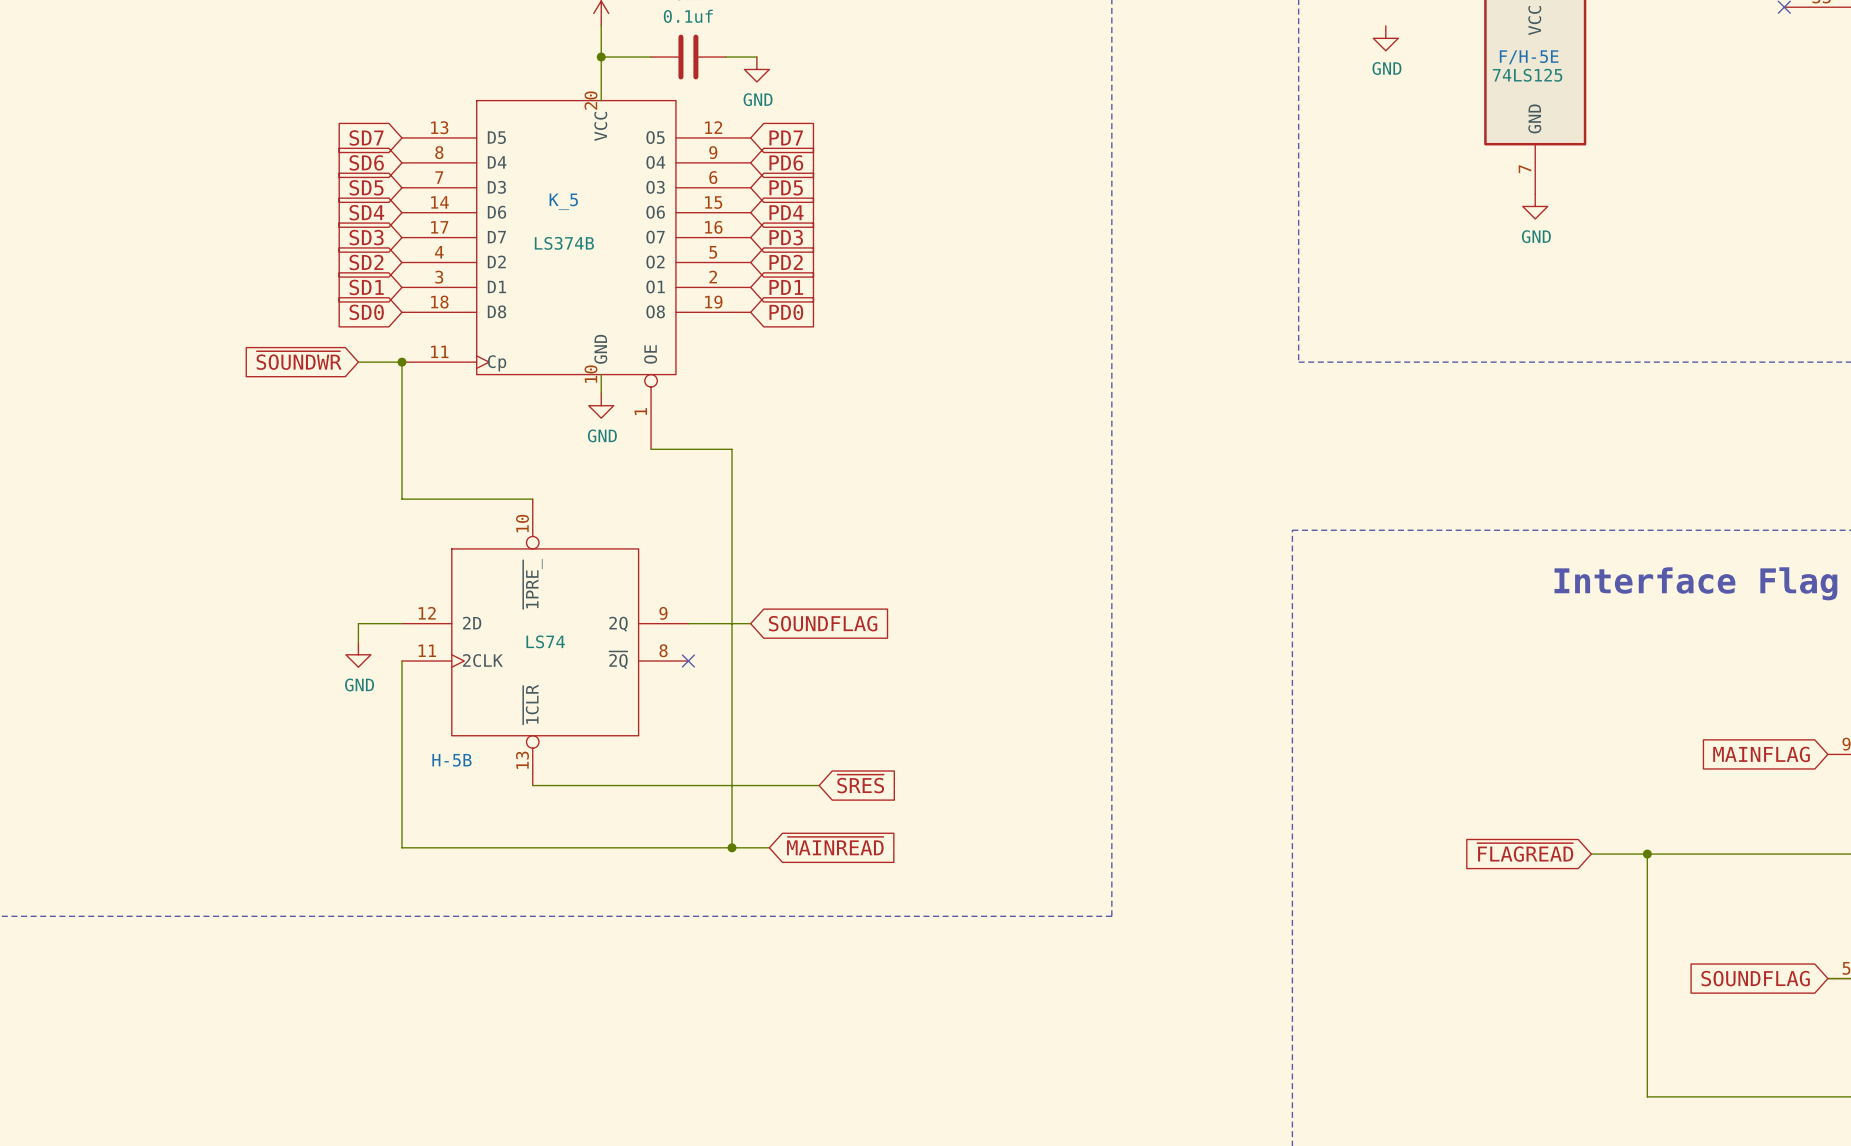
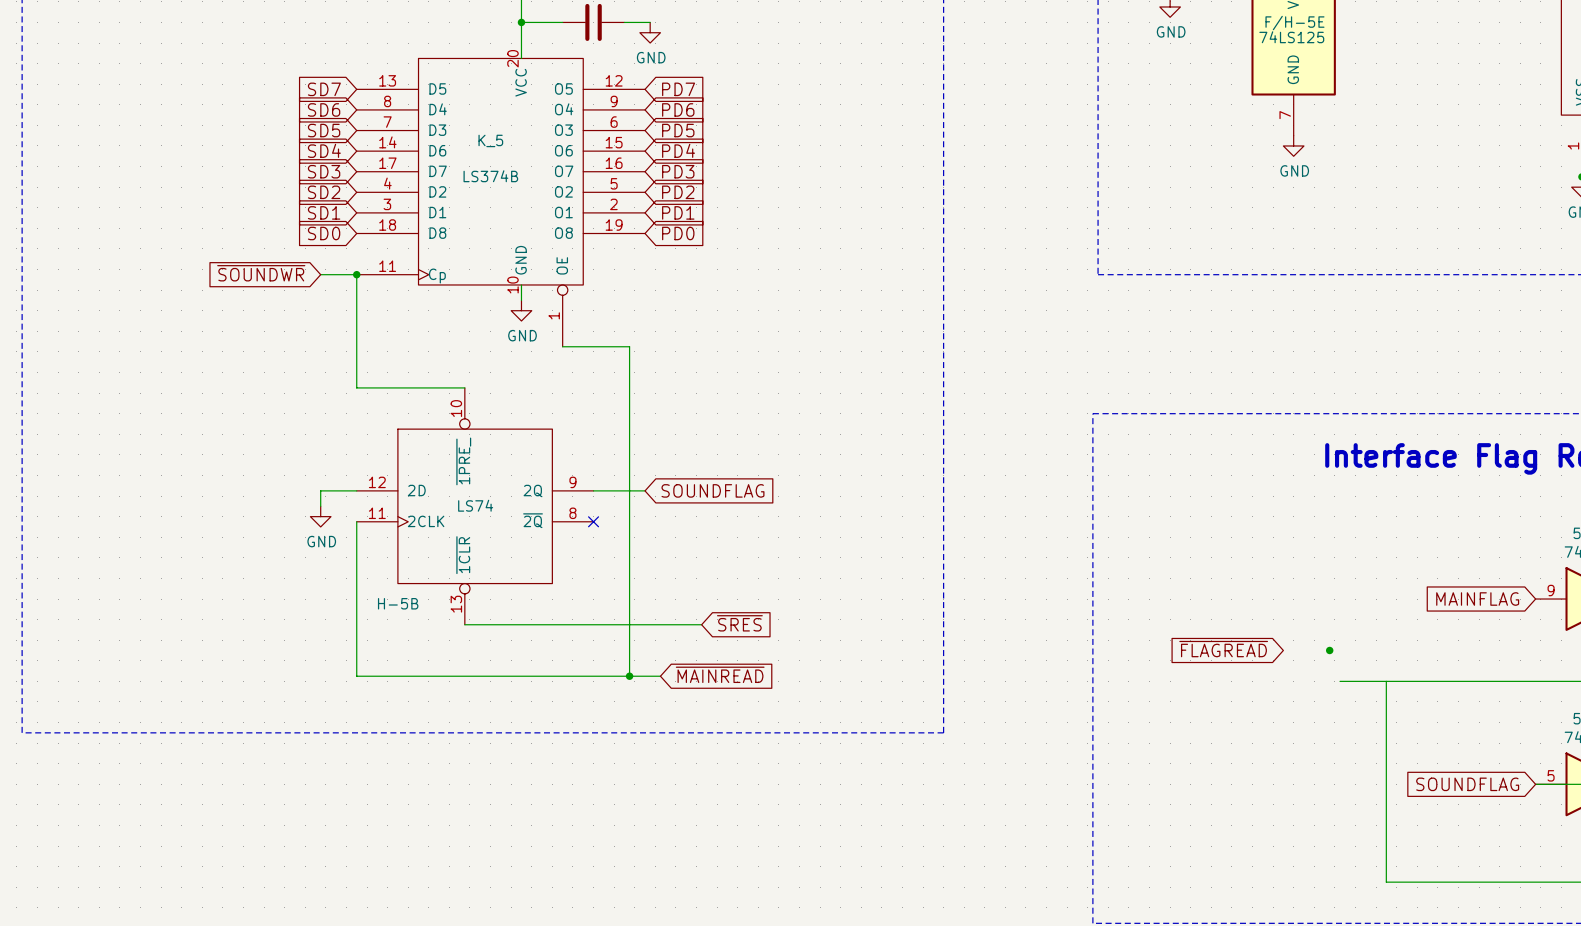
junction: none -> (1329, 650)
global label position: ~{FLAGREAD} (1525, 852) -> ~{FLAGREAD} (1223, 649)
junction: (1647, 854) -> none

